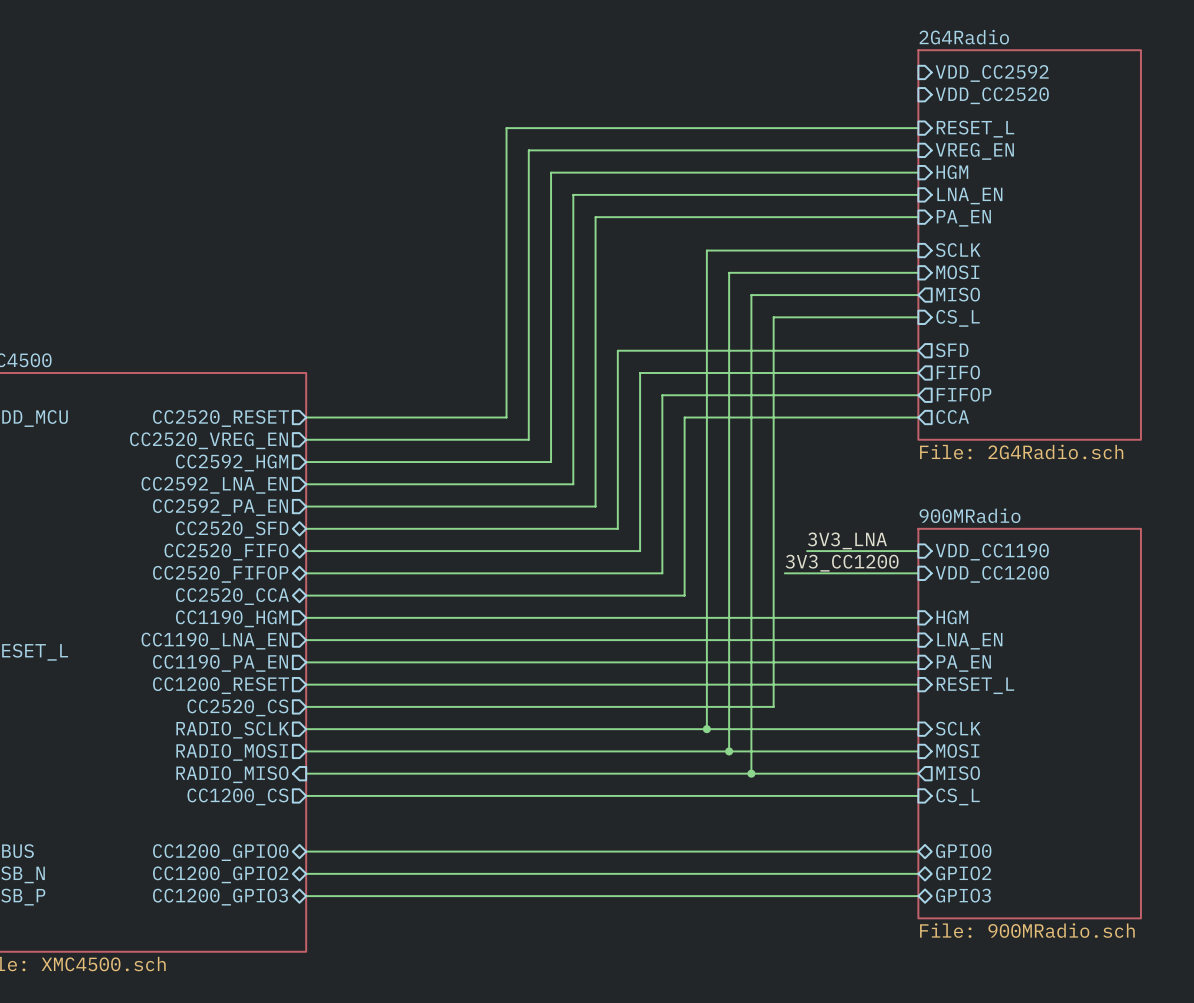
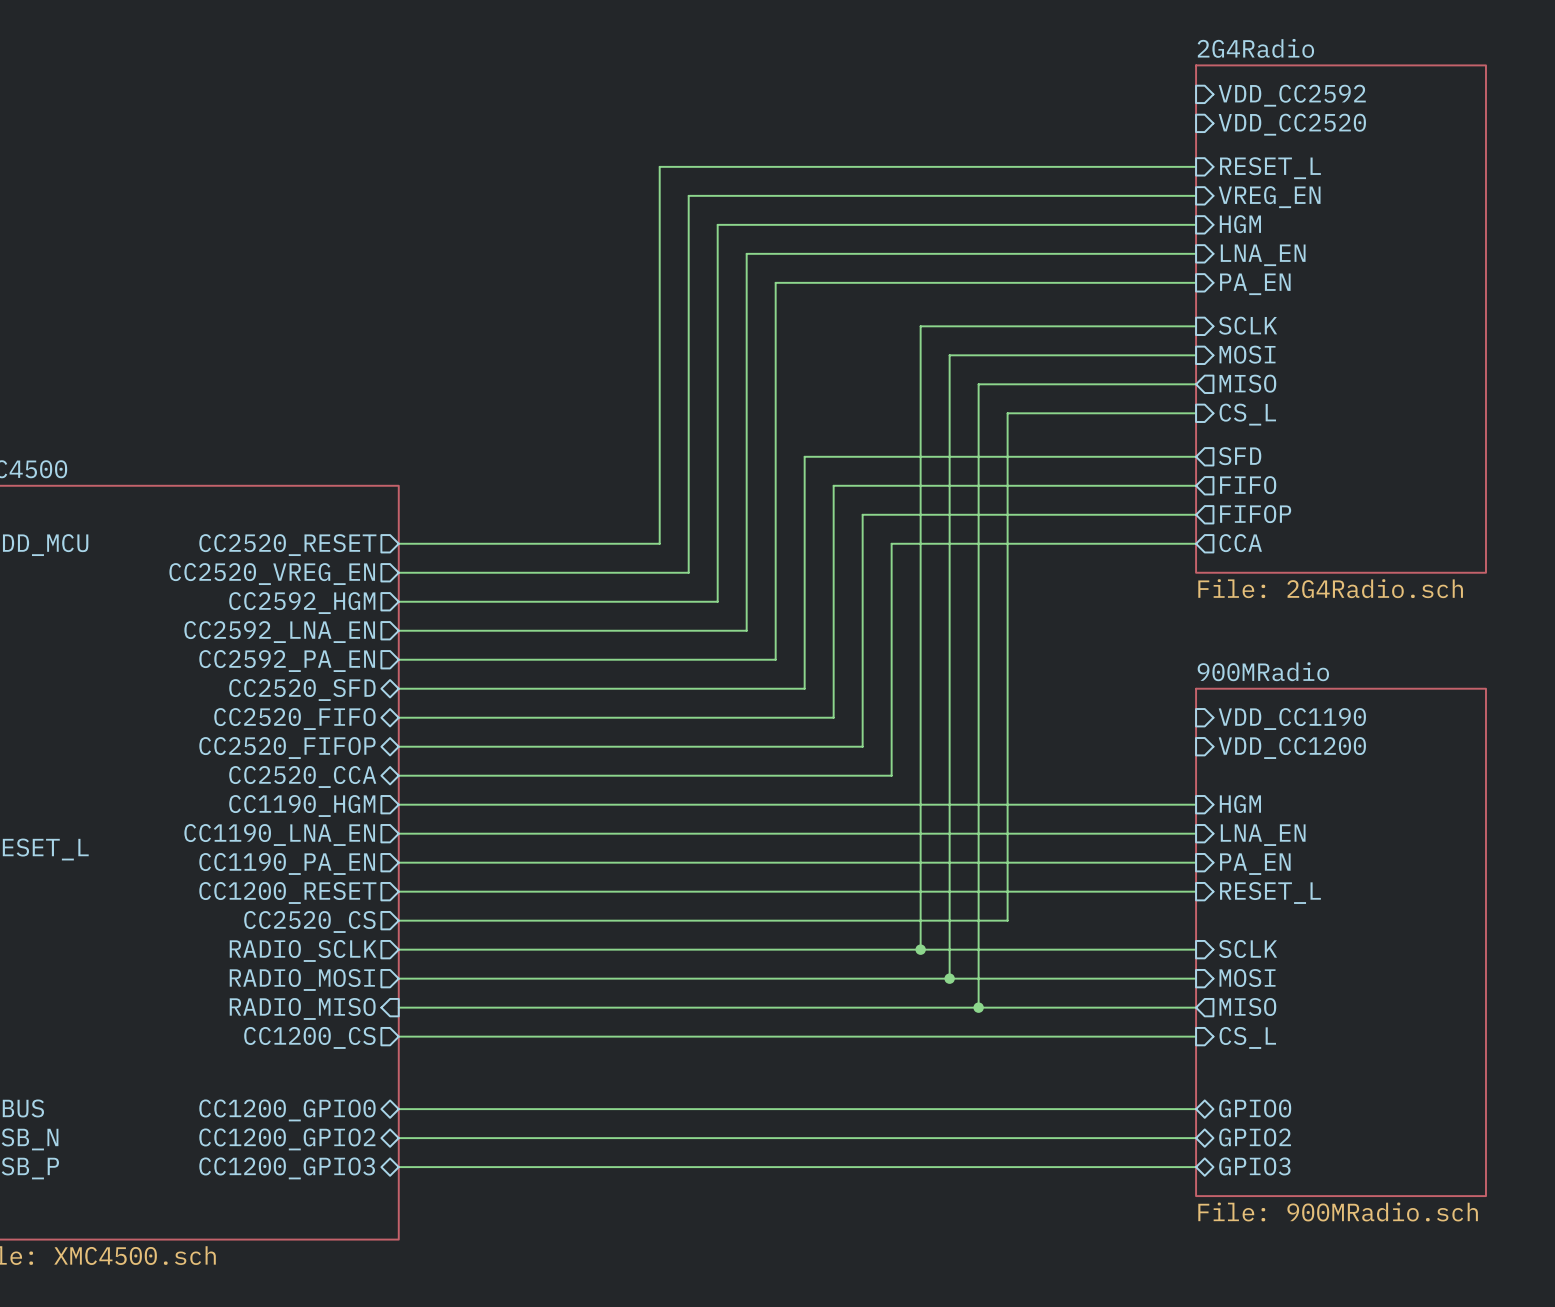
label: 3V3_LNA (847, 540) -> none
wire: (807, 551) (918, 551) -> none
label: 3V3_CC1200 (842, 563) -> none
wire: (784, 573) (918, 573) -> none

